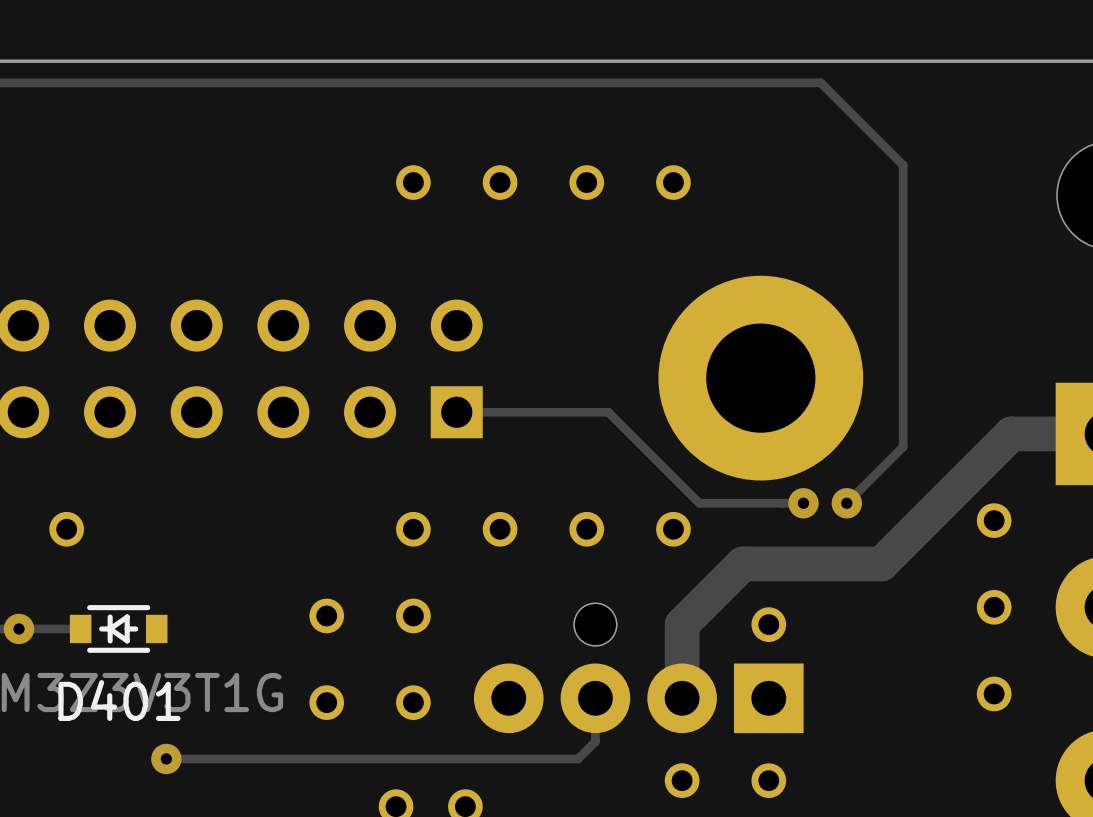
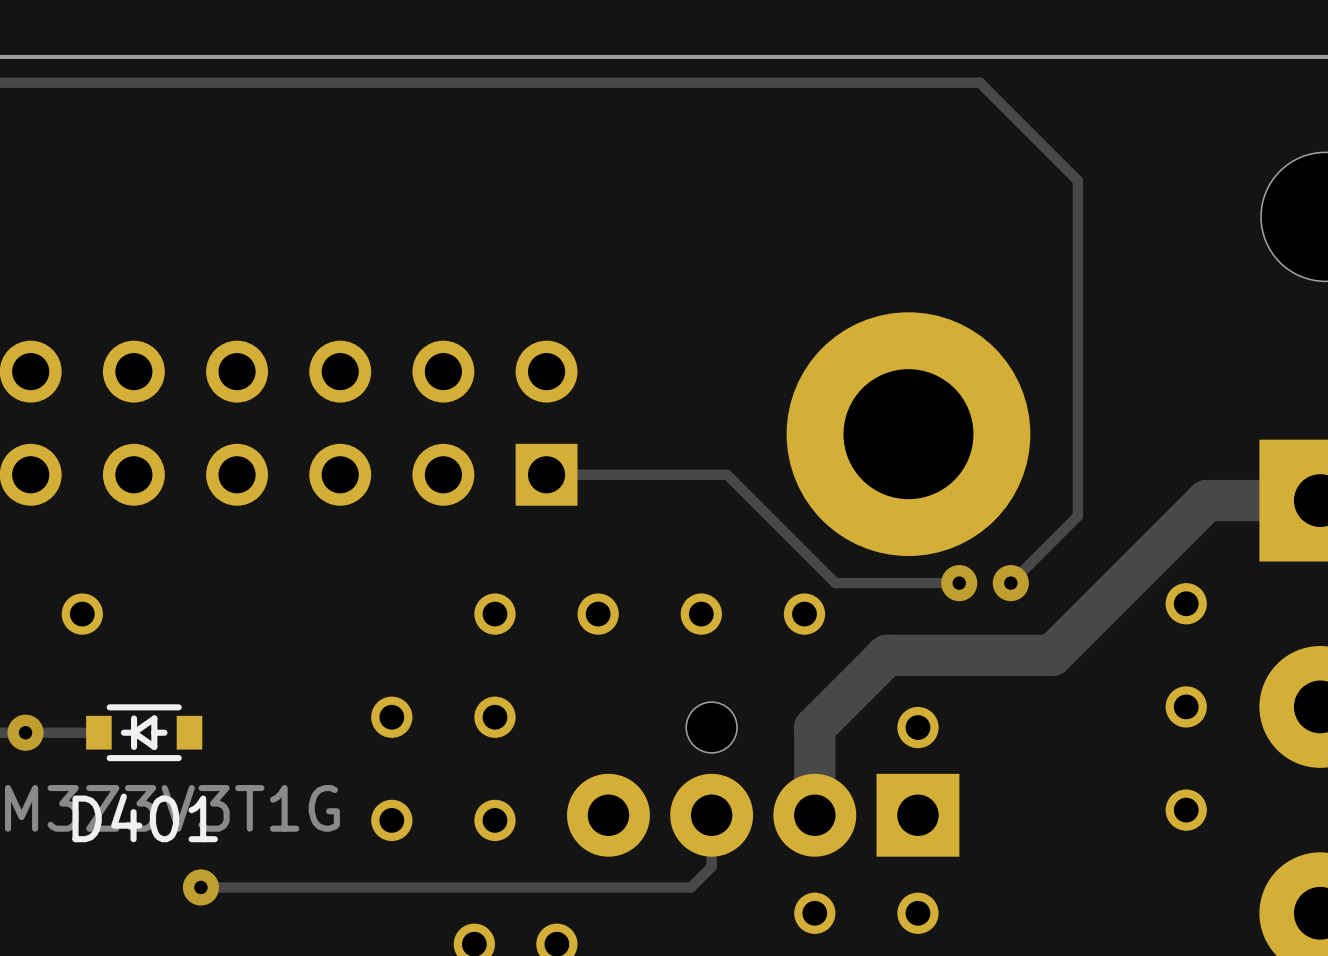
part: (413, 182) -> none
part: (500, 182) -> none
part: (586, 182) -> none
part: (673, 182) -> none

